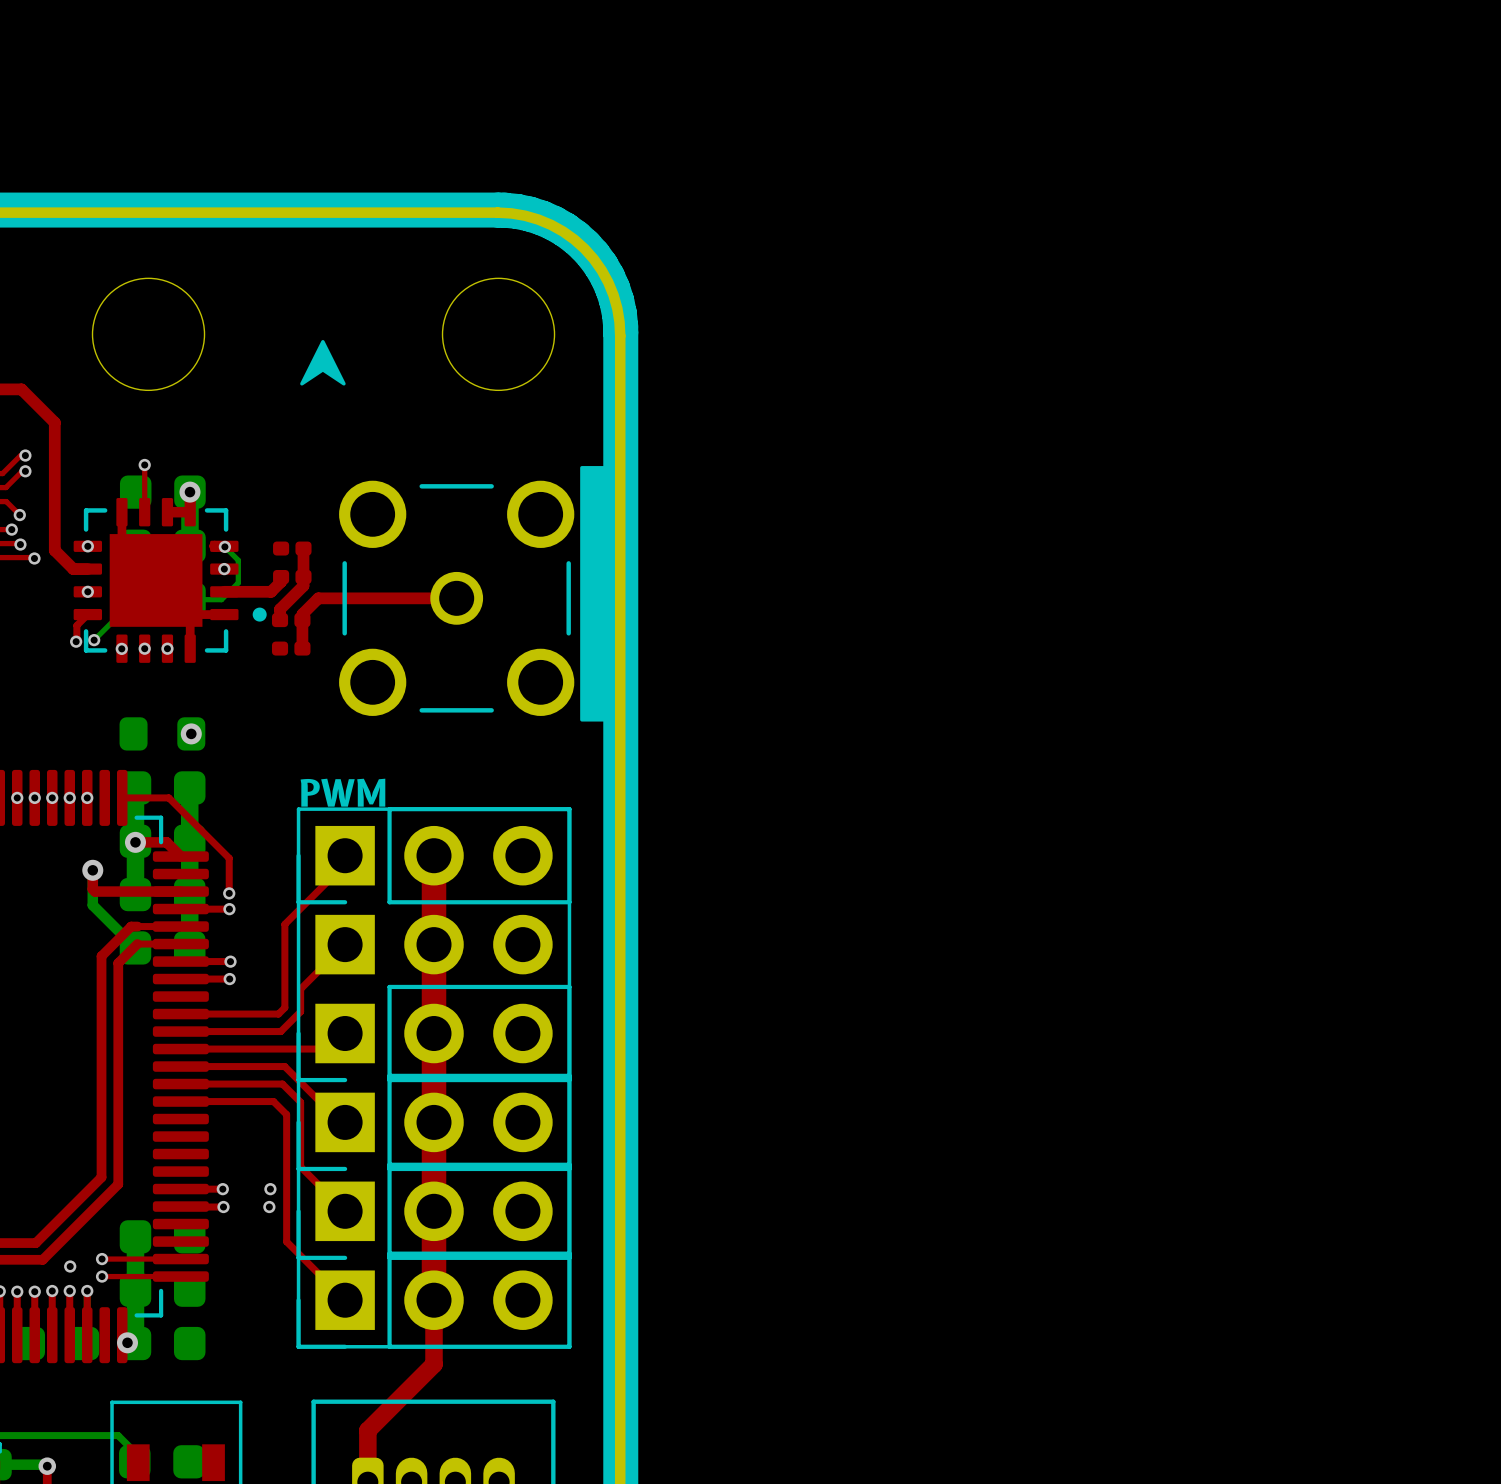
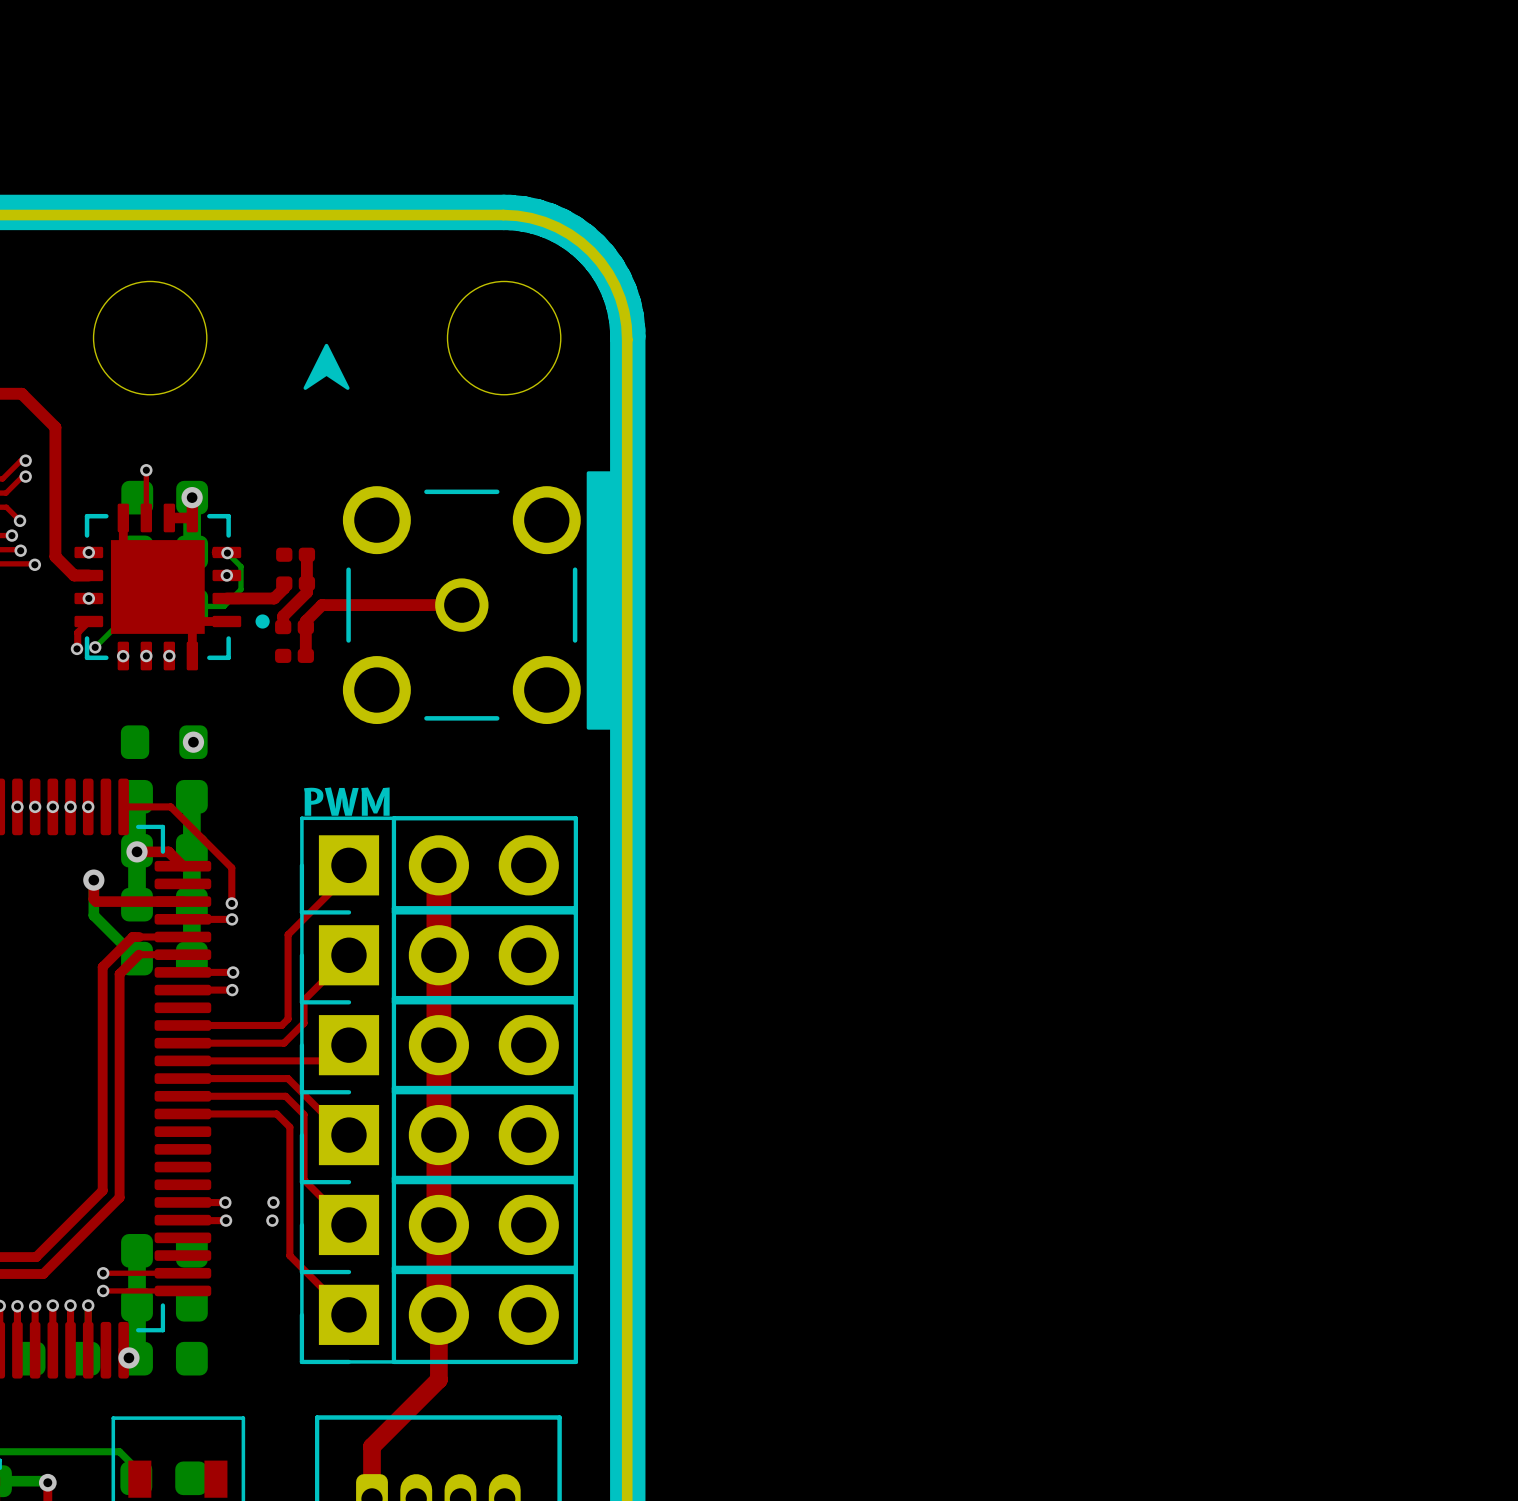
part footprint: [315, 914, 553, 975] -> [299, 906, 579, 1005]
via: (70, 1266) -> none

